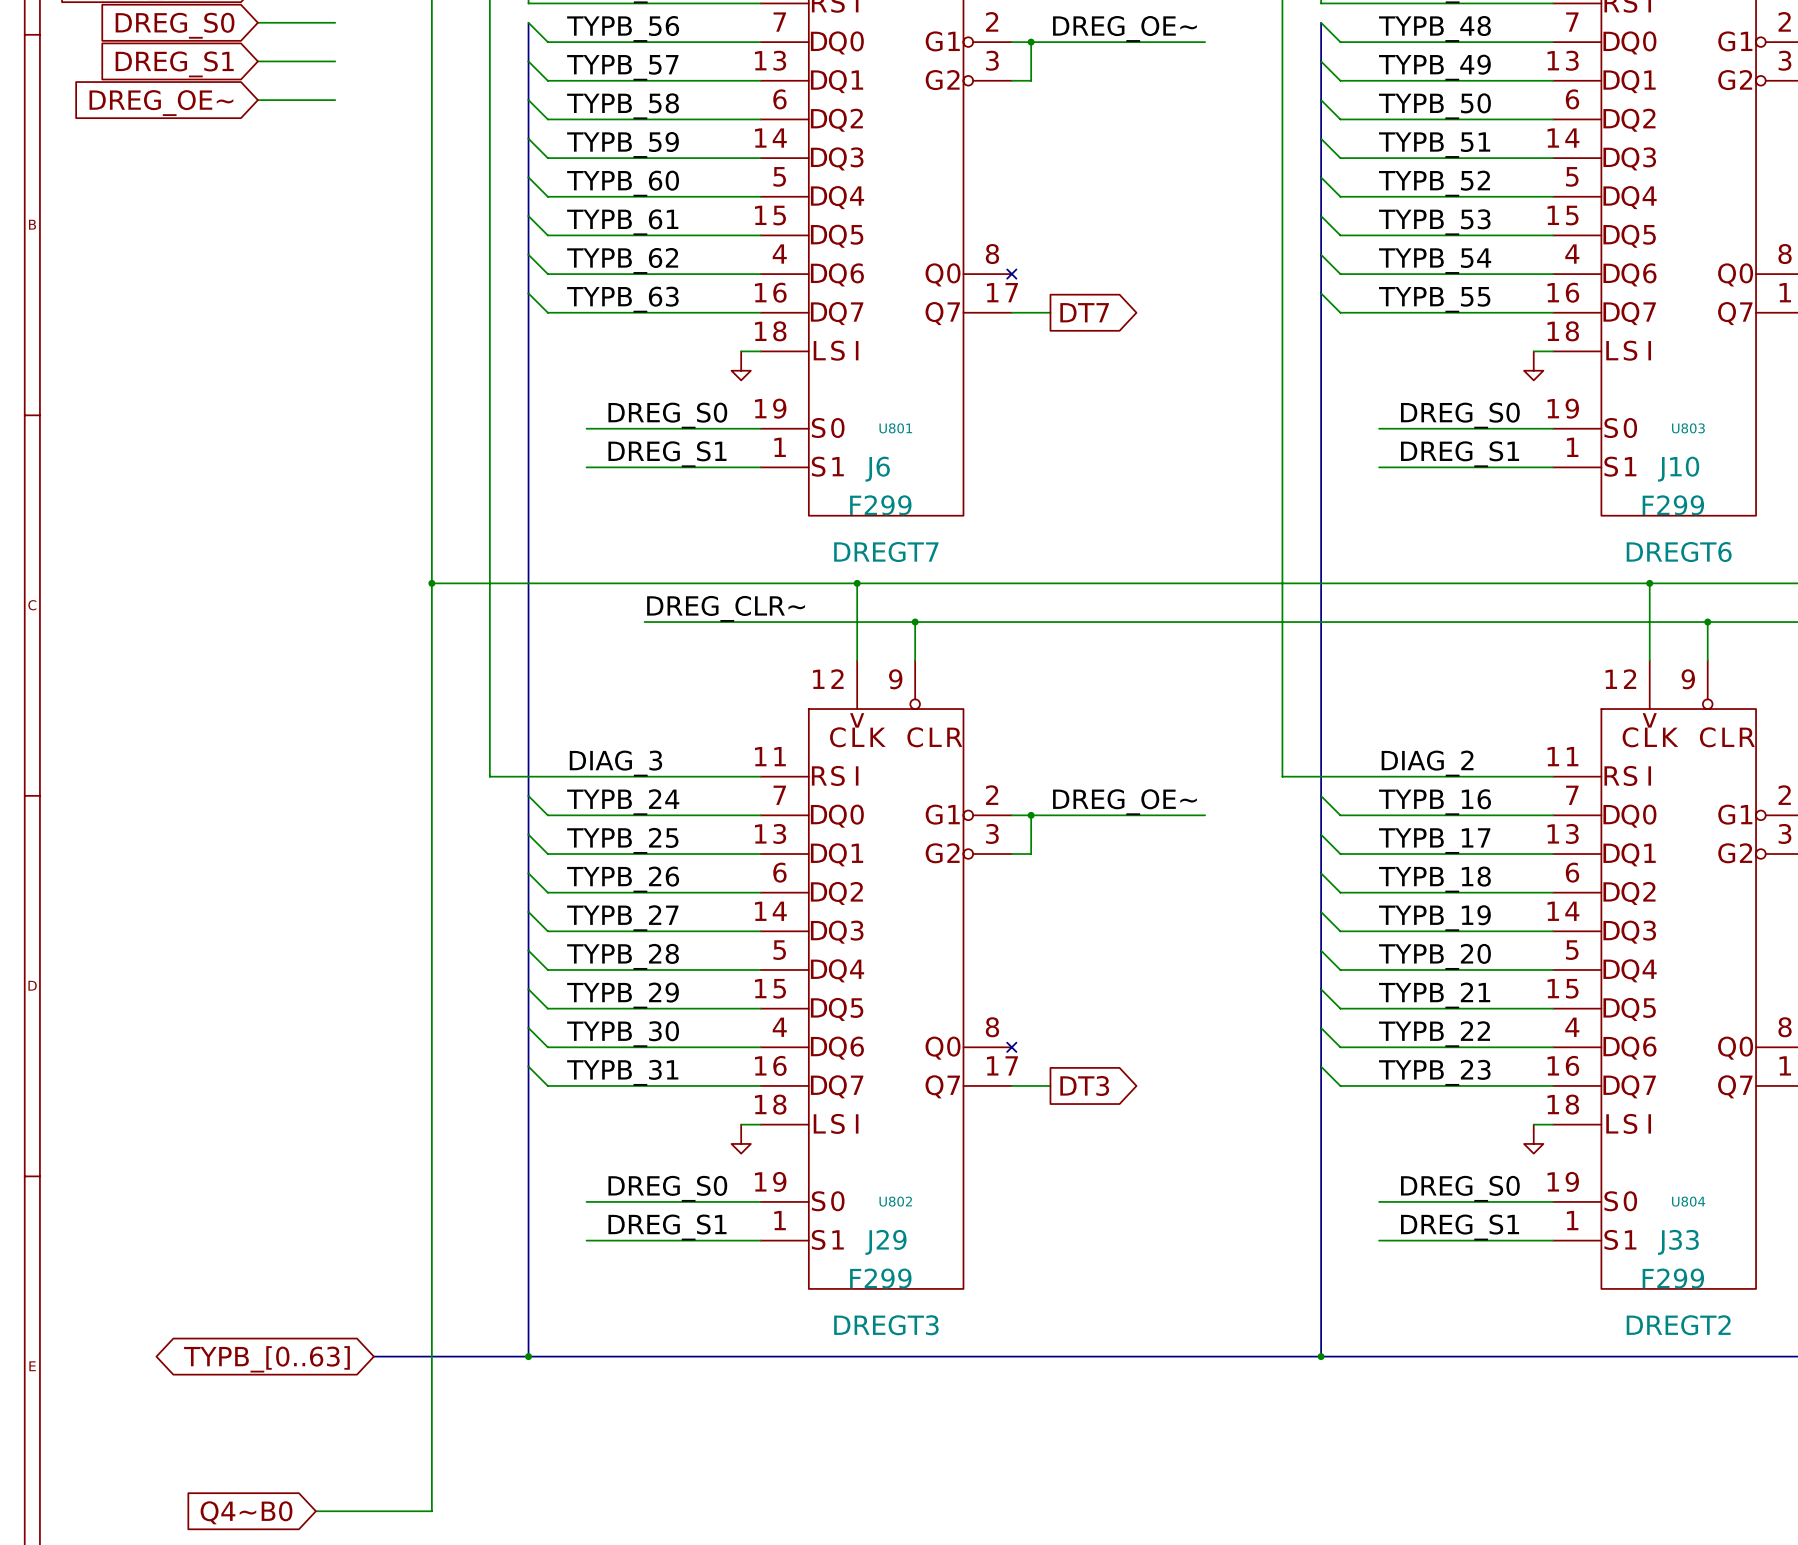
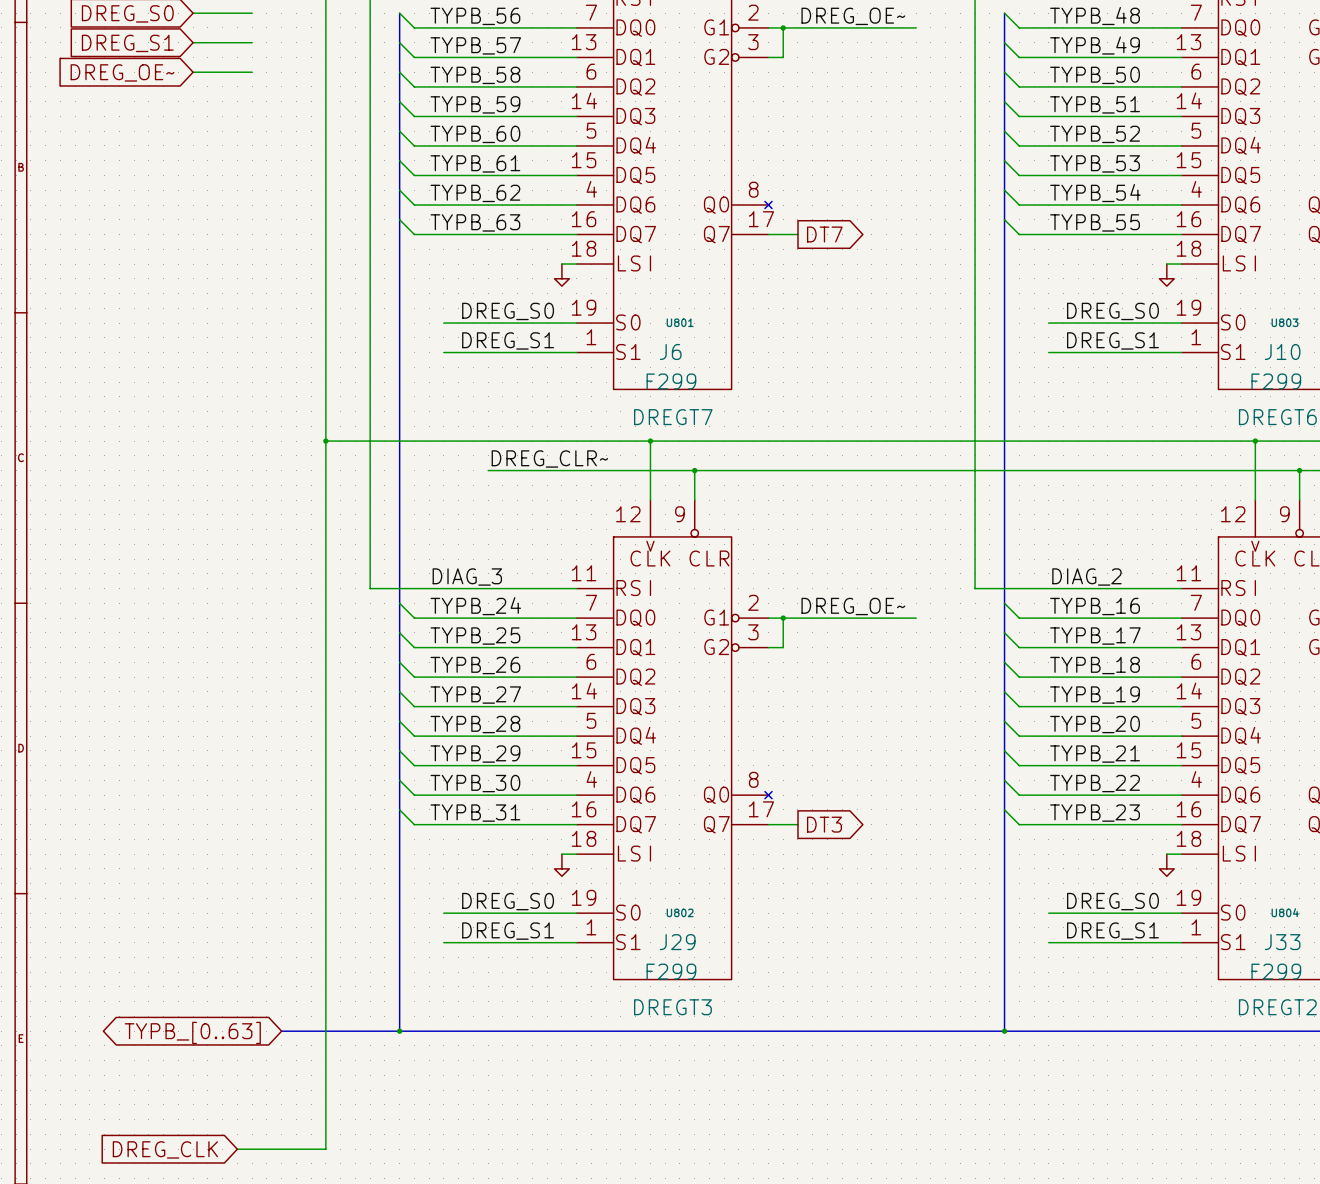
global label: Q4~B0 (246, 1512) -> DREG_CLK (165, 1149)

